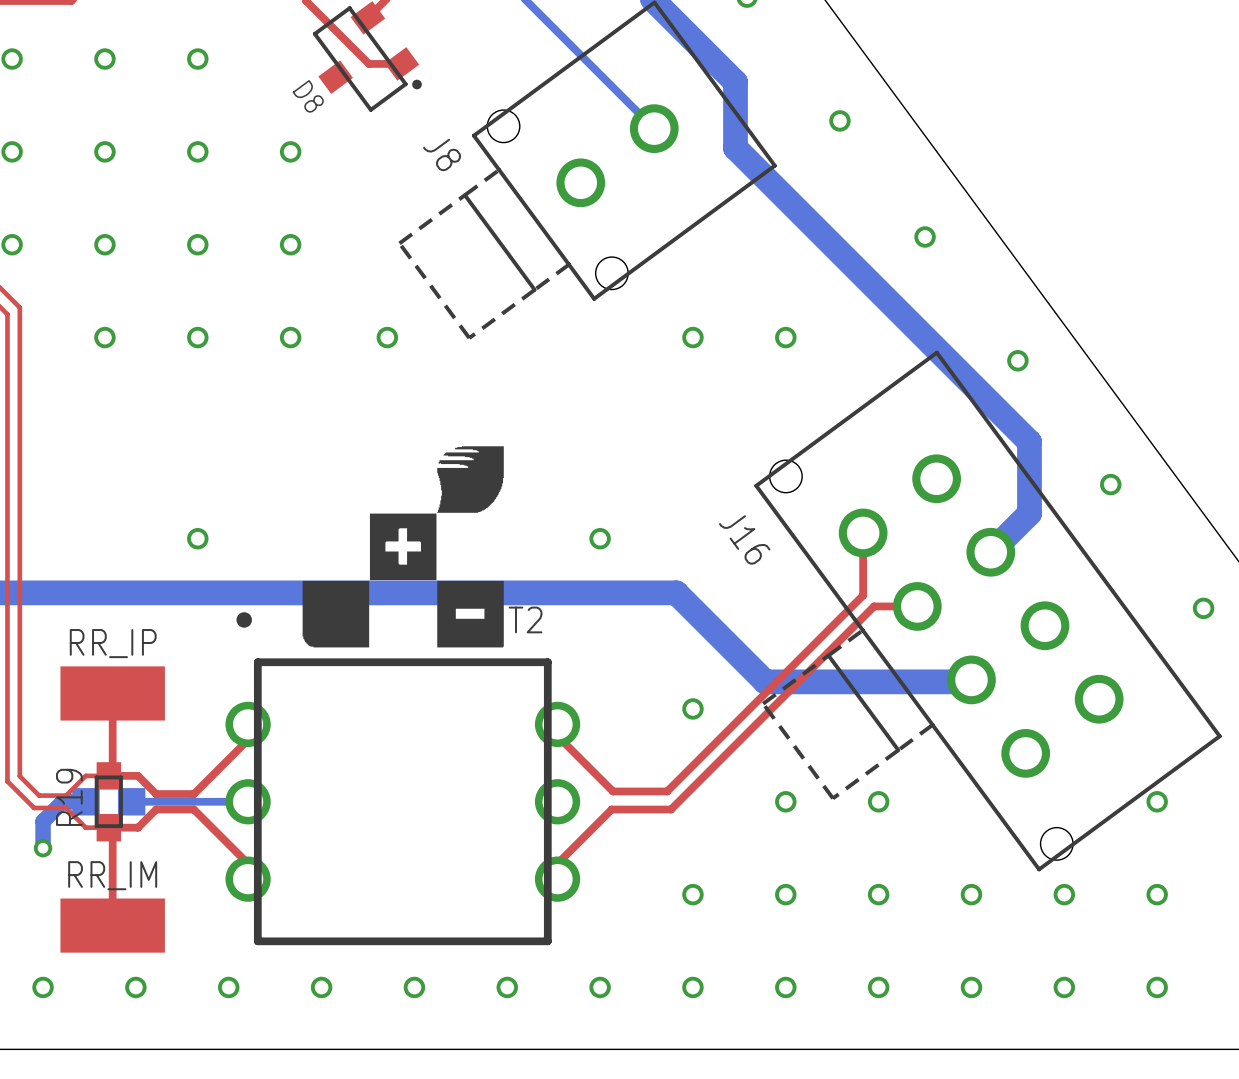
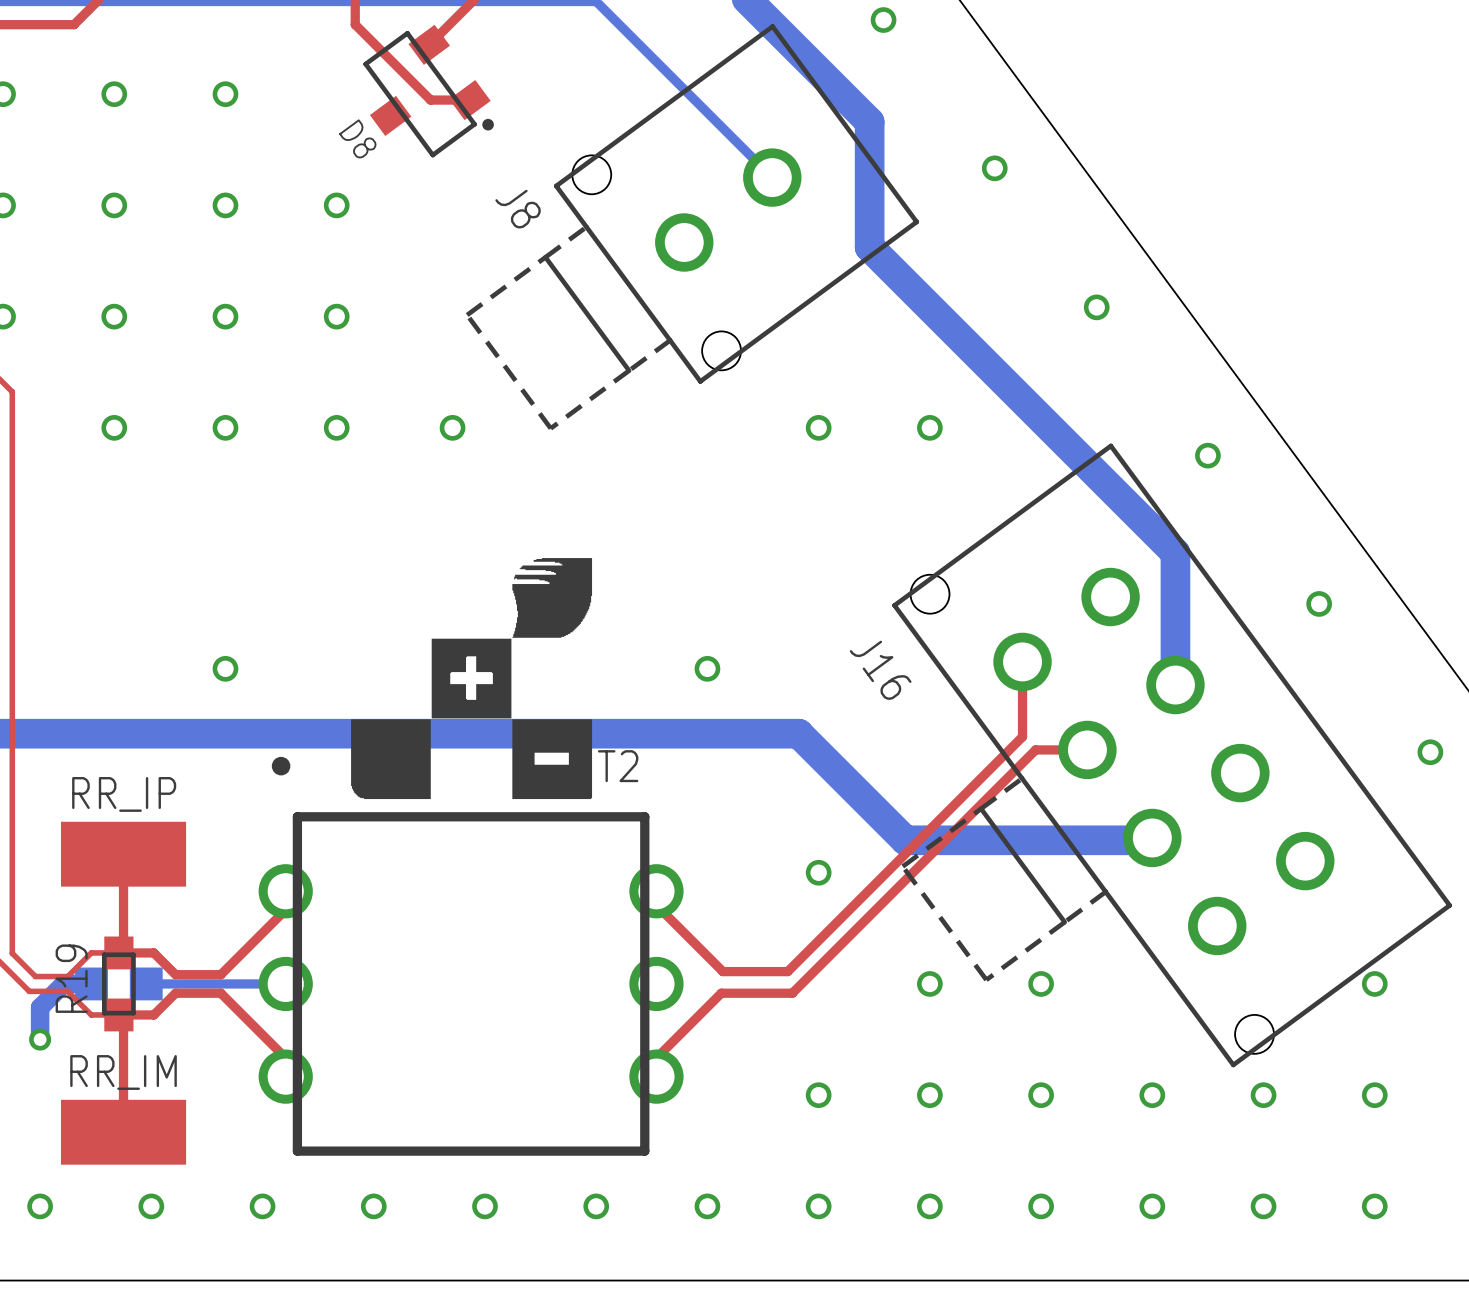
bottom track: (735, 148) (1029, 441) (1029, 513) (990, 552) -> (869, 200) (869, 247) (1175, 552) (1175, 685)

